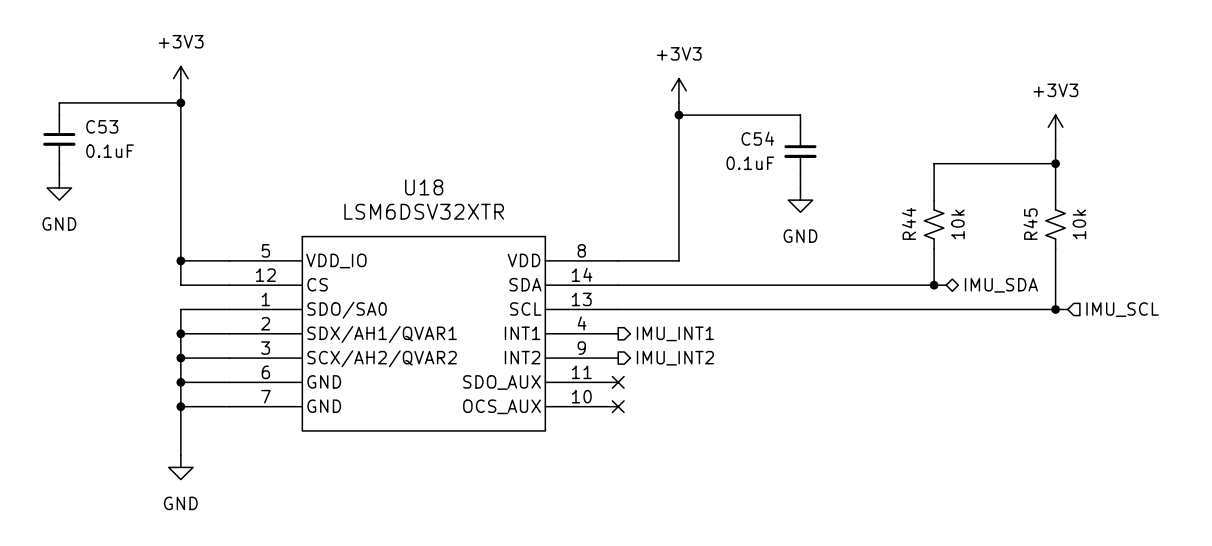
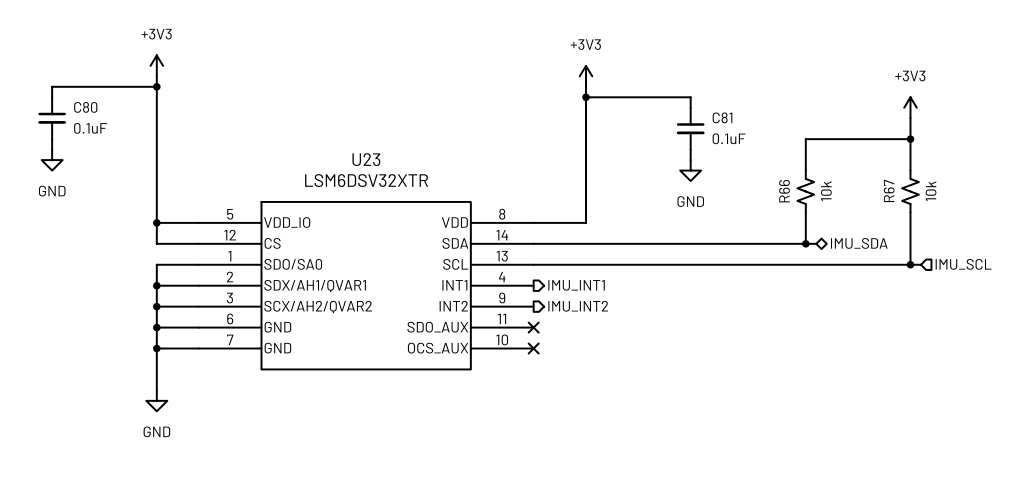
C53 name: C53 (102, 126) -> C80 (85, 107)
C54 name: C54 (757, 138) -> C81 (722, 117)
C54 value position: 0.1uF (750, 163) -> 0.1uF (729, 138)
U18 name: U18 (424, 187) -> U23 (366, 159)
R44 name: R44 (909, 223) -> R66 (784, 191)
R45 name: R45 (1030, 224) -> R67 (889, 190)

